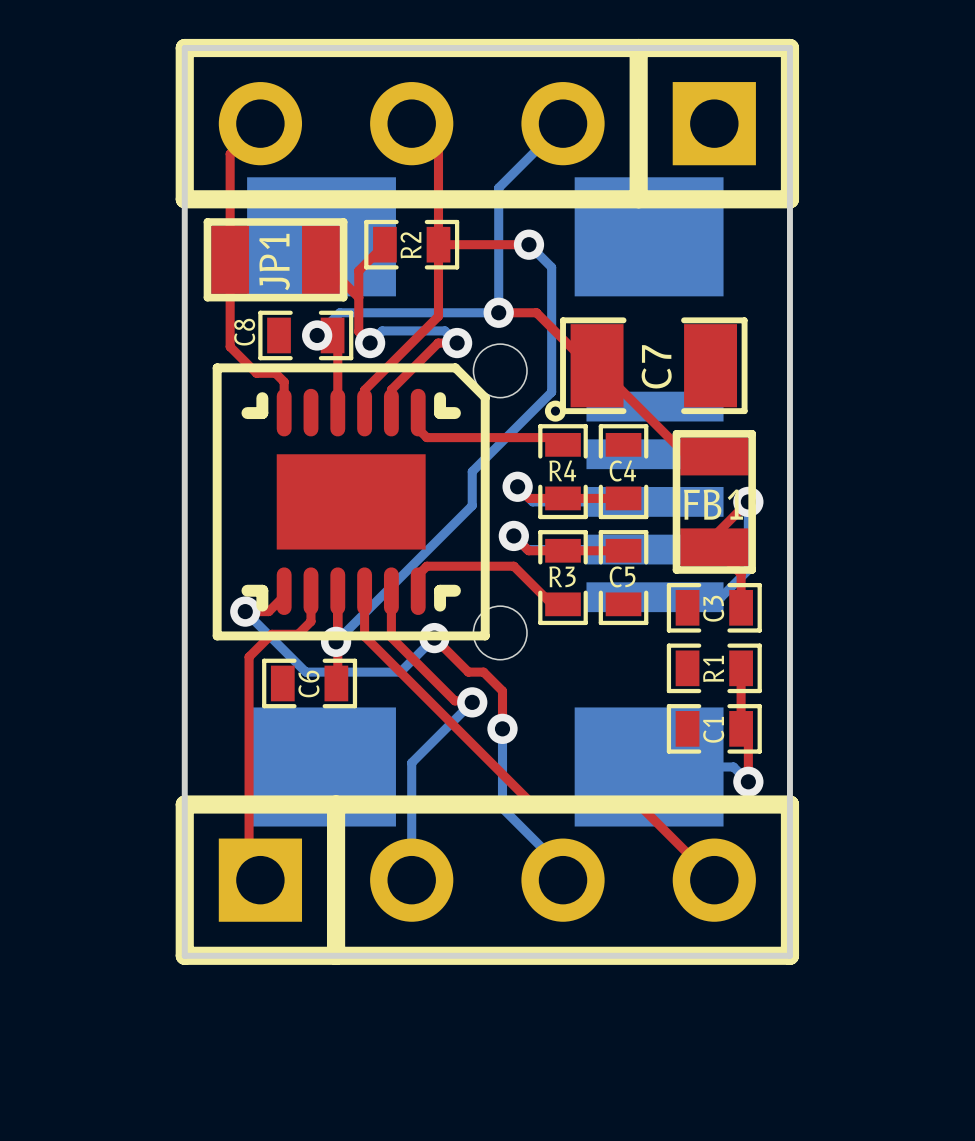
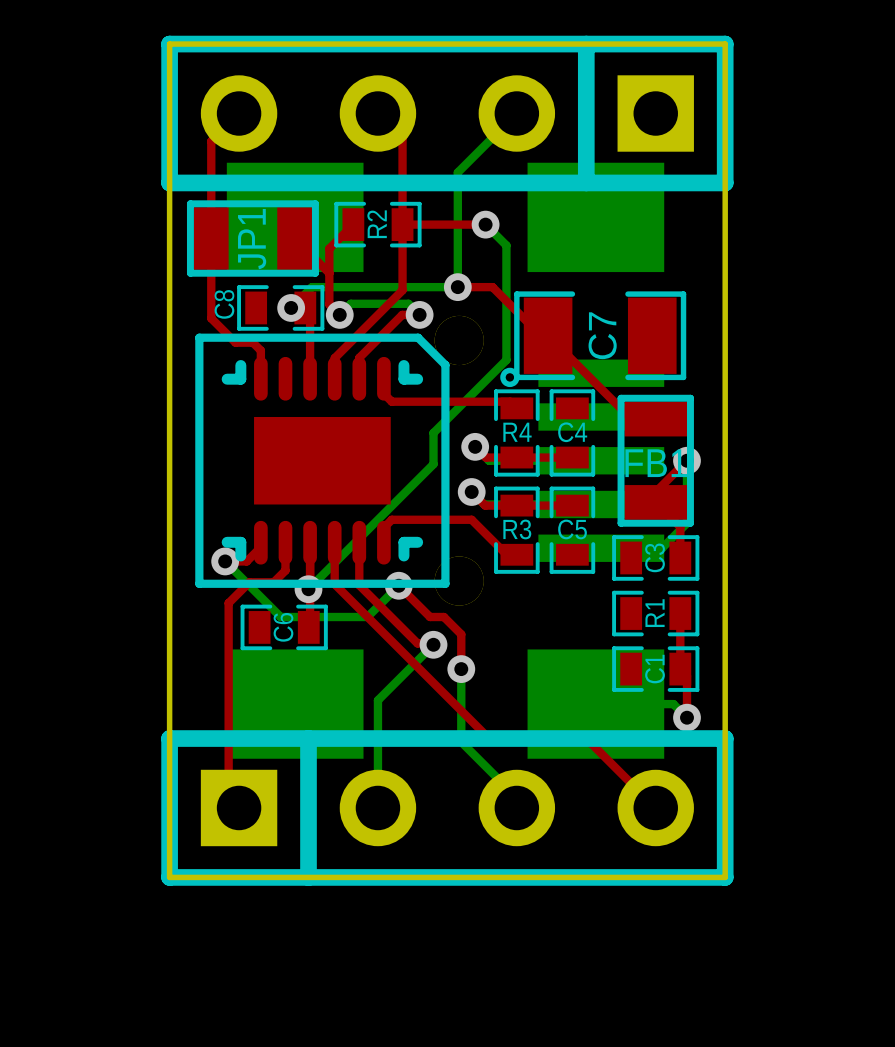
part footprint: [247, 177, 724, 827] -> [226, 162, 665, 759]

